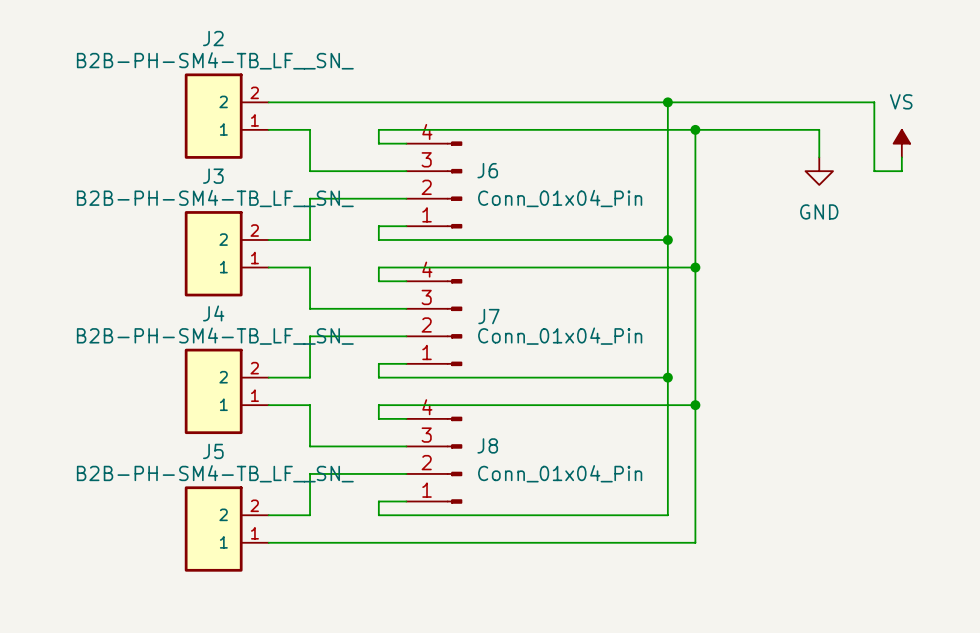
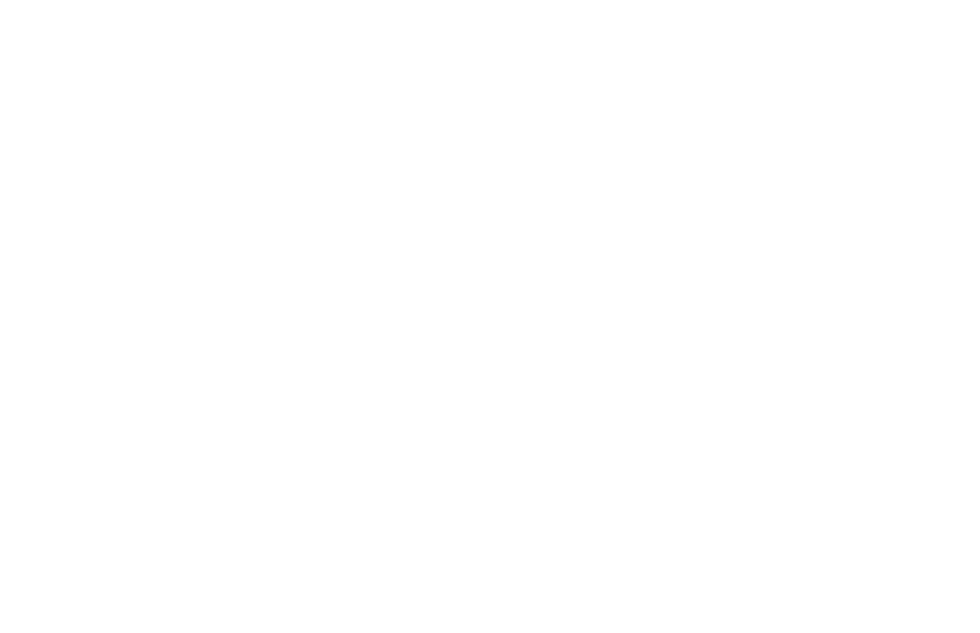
wire: (268, 102) (874, 102) (874, 171) (901, 171) (901, 157) -> none
wire: (667, 102) (667, 515) (378, 515) (378, 501) (406, 501) -> none
junction: (667, 102) -> none
J2: B2B-PH-SM4-TB_LF__SN_ (226, 116) -> none
wire: (268, 129) (310, 129) (310, 171) (406, 171) -> none
wire: (695, 129) (695, 542) (268, 542) -> none
junction: (695, 129) -> none
wire: (406, 143) (378, 143) (378, 129) (819, 129) (819, 157) -> none
power symbol: VS (901, 143) -> none
power symbol: GND (819, 171) -> none
J6: Conn_01x04_Pin (434, 184) -> none
wire: (406, 198) (310, 198) (310, 239) (268, 239) -> none
wire: (406, 226) (378, 226) (378, 239) (667, 239) -> none
junction: (667, 239) -> none
J3: B2B-PH-SM4-TB_LF__SN_ (226, 253) -> none
wire: (268, 267) (310, 267) (310, 308) (406, 308) -> none
wire: (695, 267) (378, 267) (378, 281) (406, 281) -> none
junction: (695, 267) -> none
J7: Conn_01x04_Pin (434, 322) -> none
wire: (406, 336) (310, 336) (310, 377) (268, 377) -> none
wire: (406, 363) (378, 363) (378, 377) (667, 377) -> none
junction: (667, 377) -> none
J4: B2B-PH-SM4-TB_LF__SN_ (226, 391) -> none
wire: (268, 405) (310, 405) (310, 446) (406, 446) -> none
wire: (695, 405) (378, 405) (378, 418) (406, 418) -> none
junction: (695, 405) -> none
J8: Conn_01x04_Pin (434, 460) -> none
wire: (406, 473) (310, 473) (310, 515) (268, 515) -> none
J5: B2B-PH-SM4-TB_LF__SN_ (226, 529) -> none

